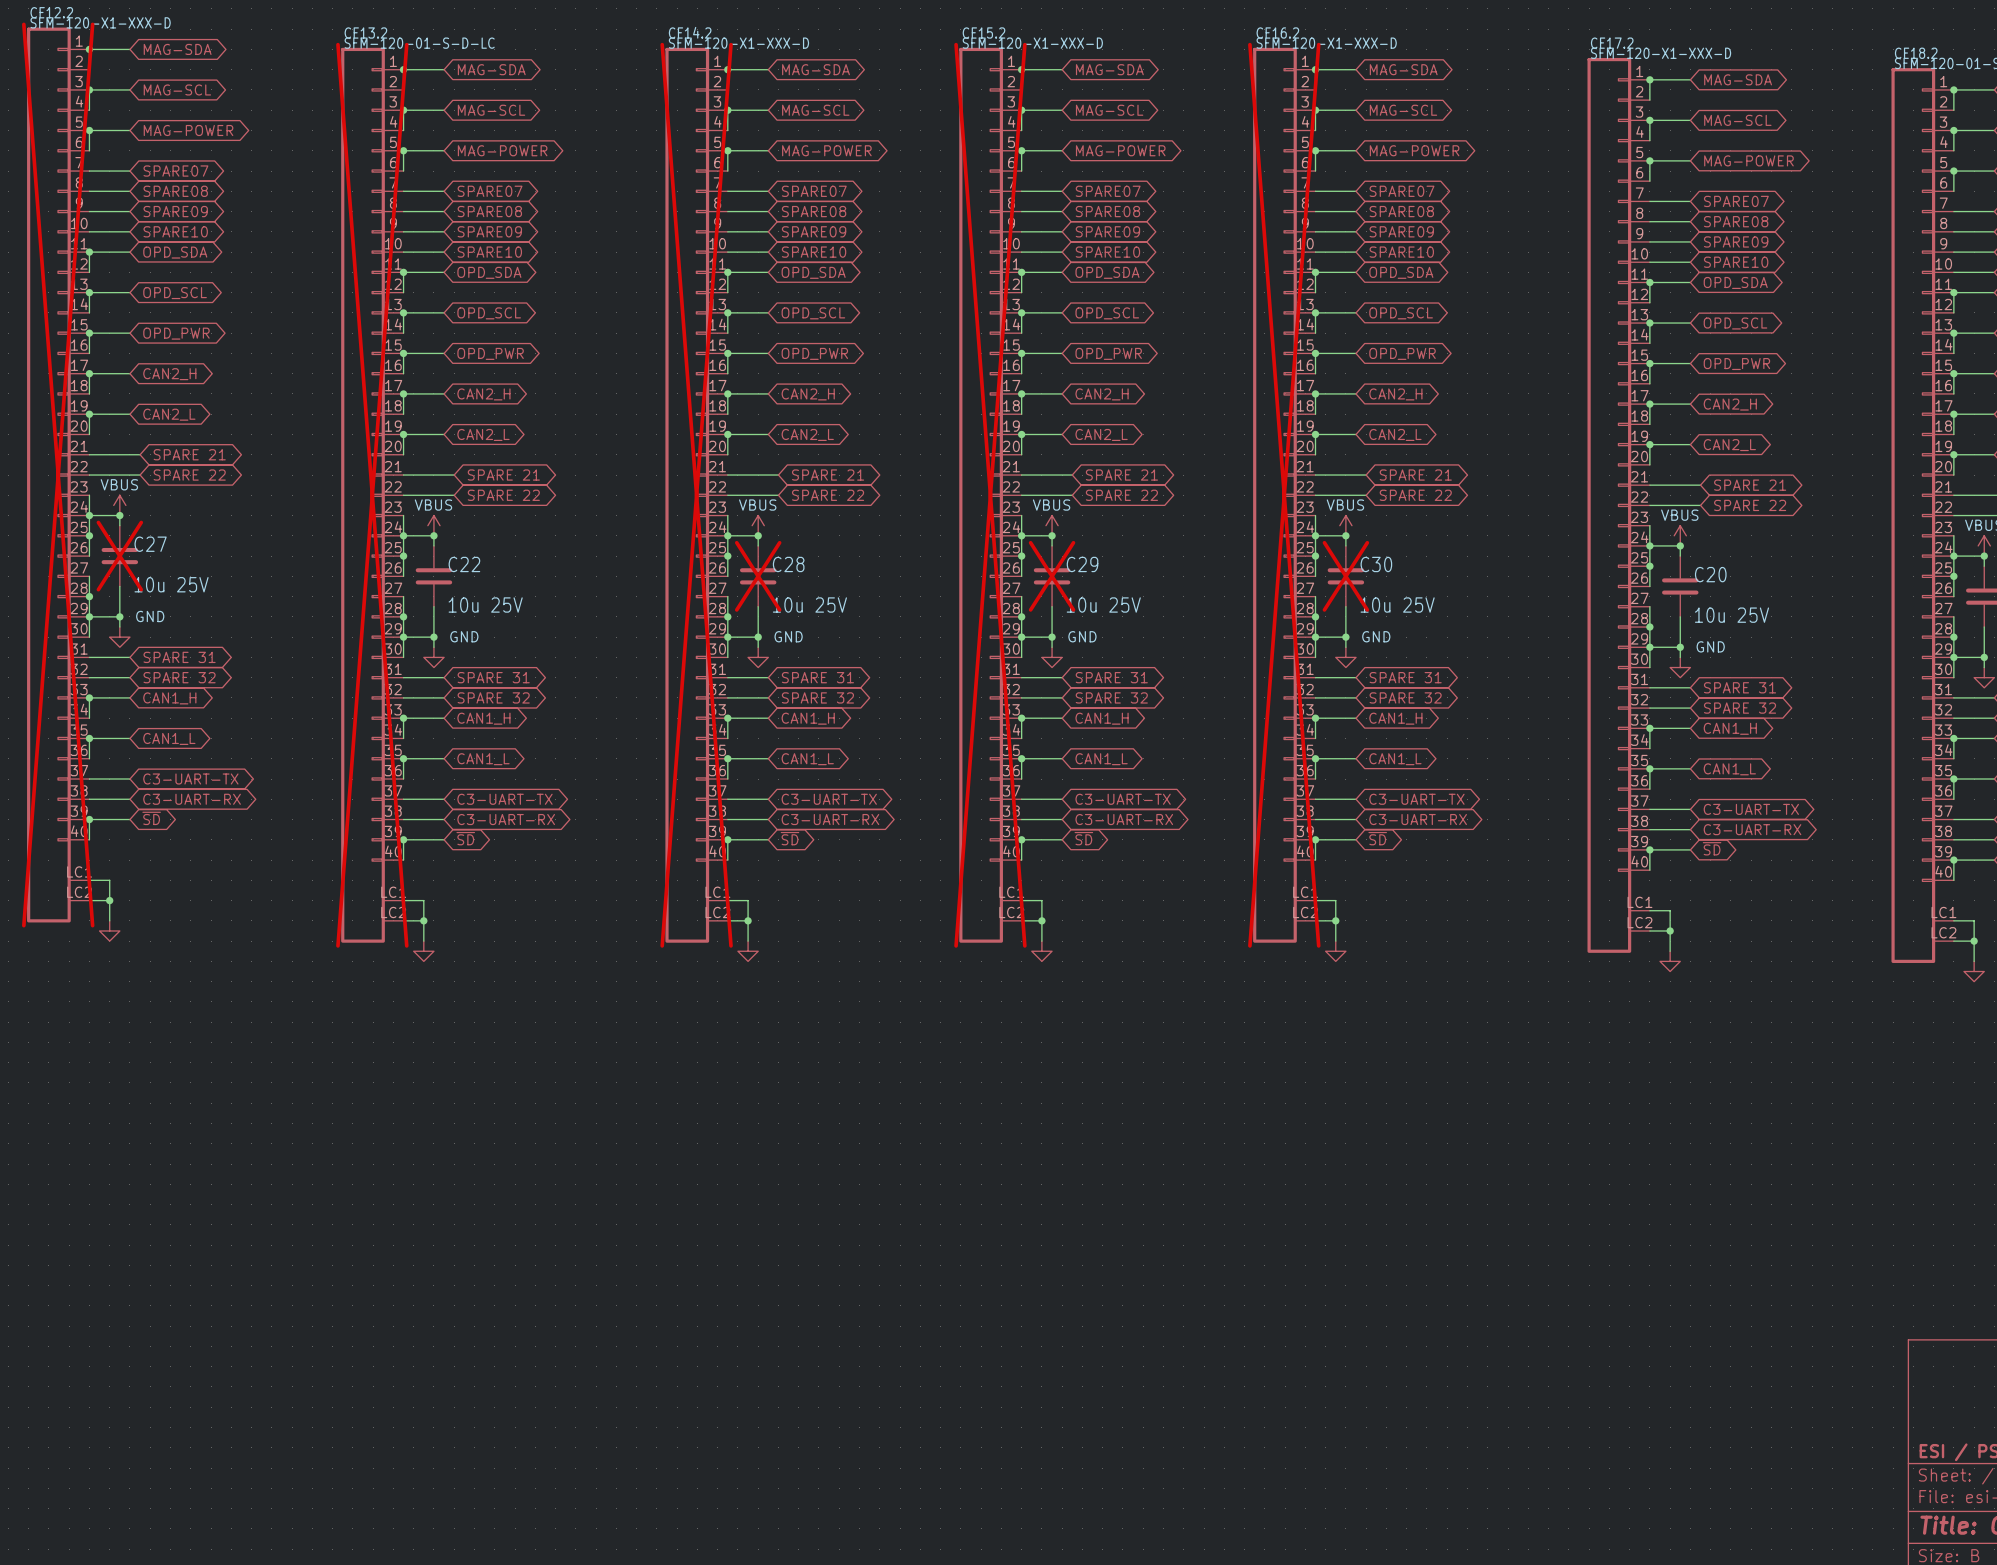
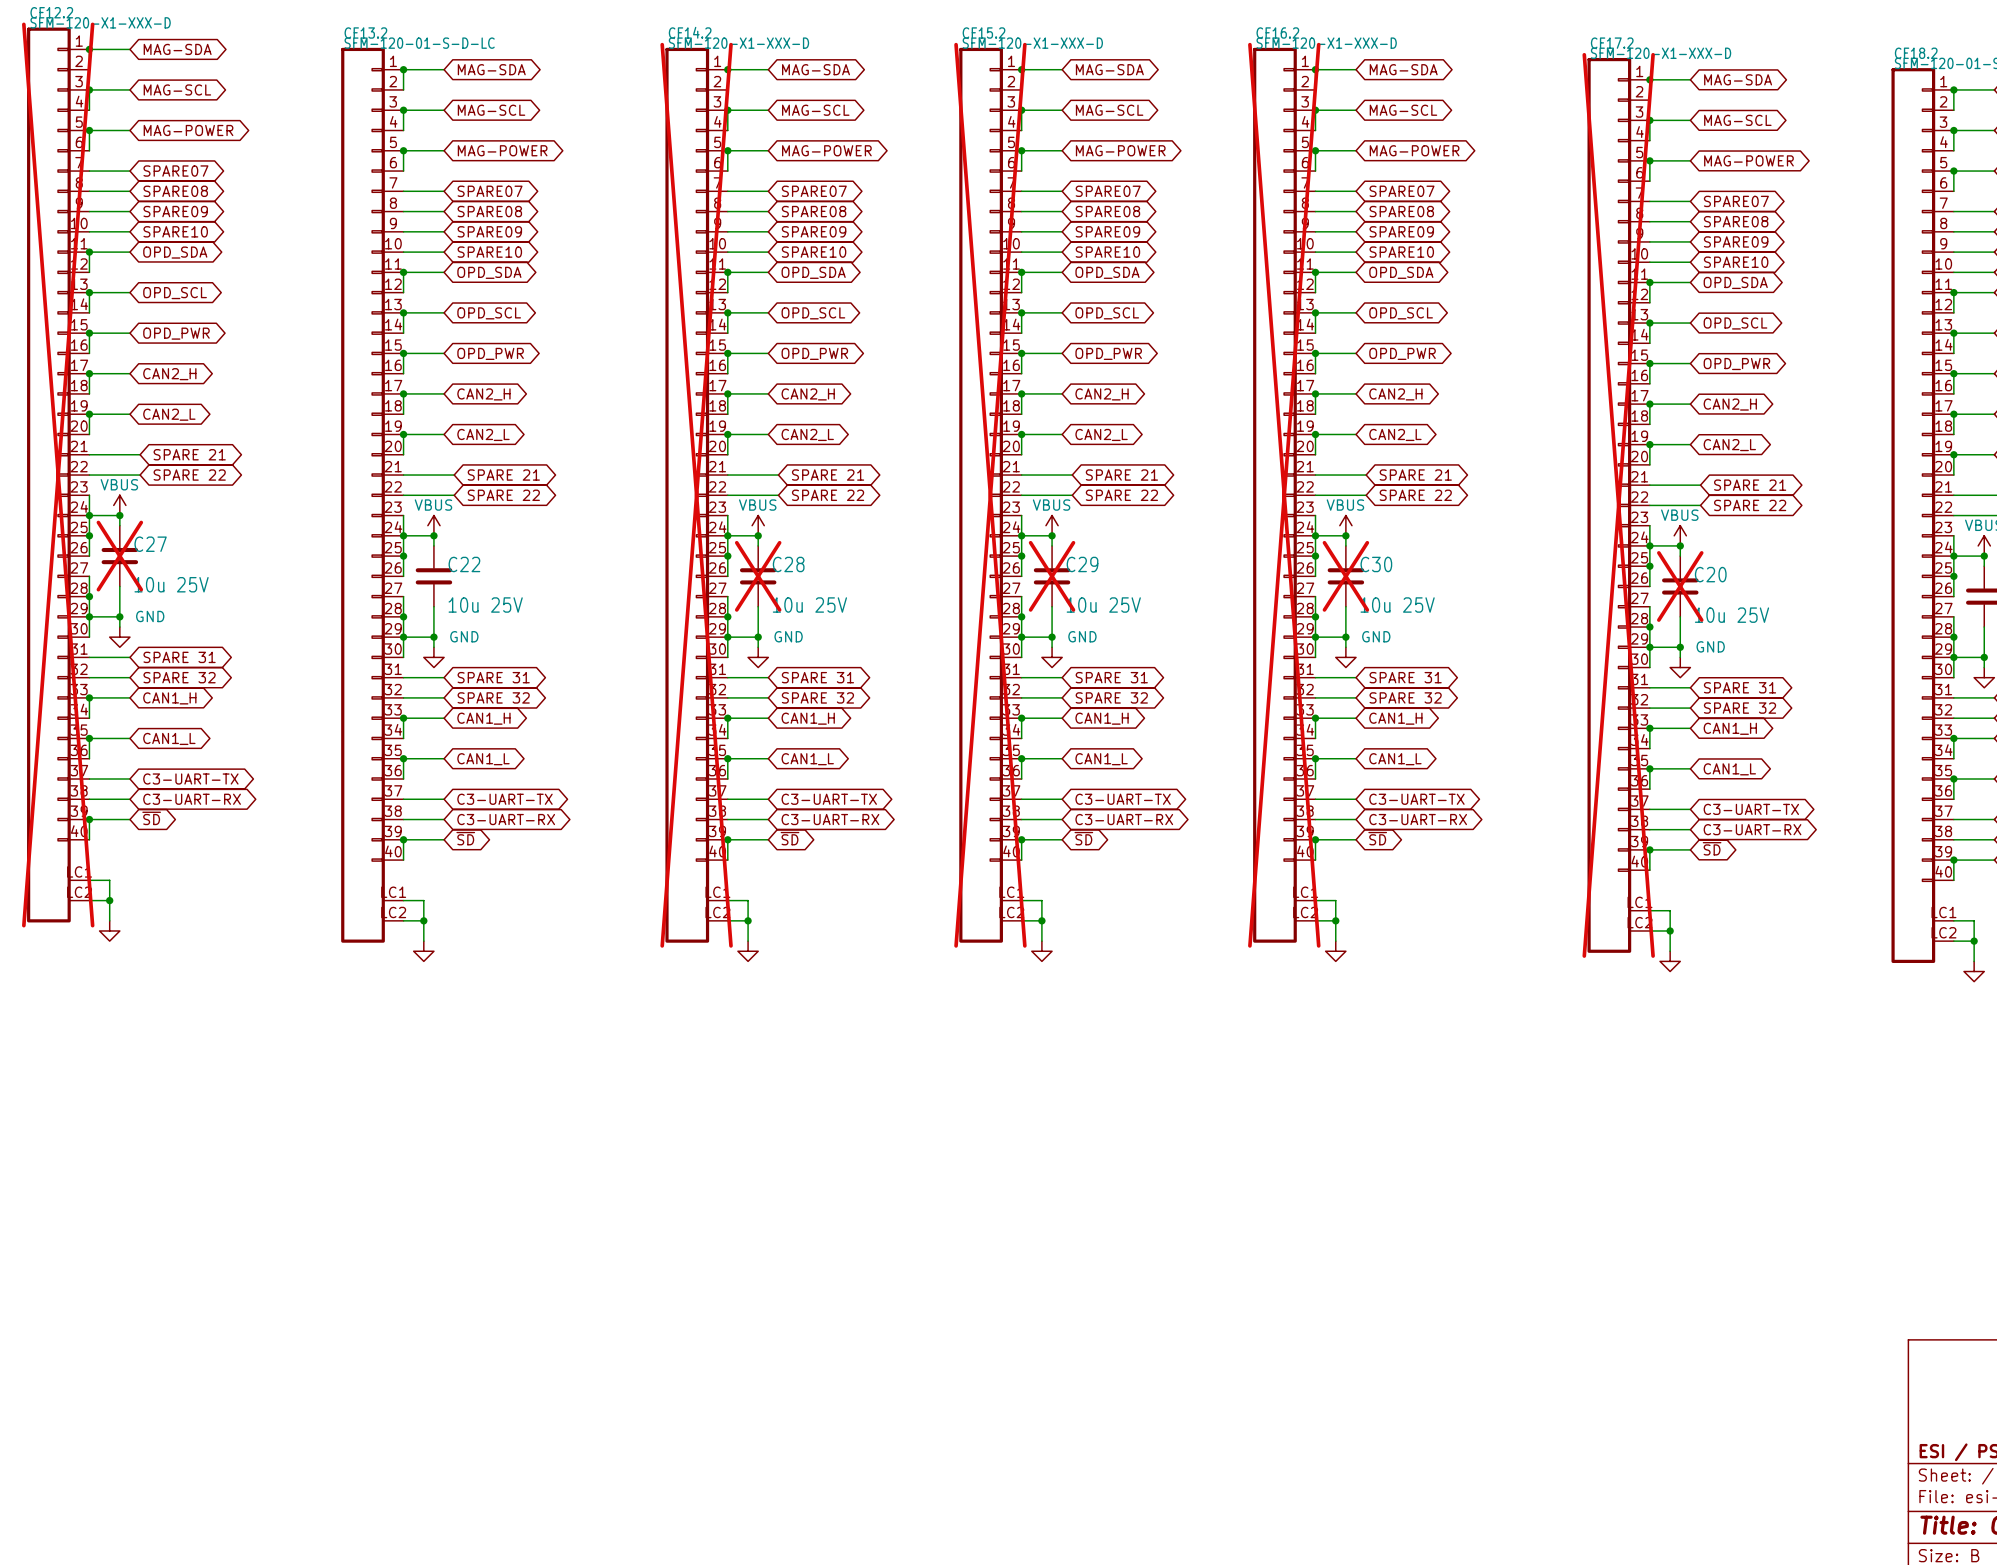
CF13.2 do-not-place cross: (372, 495) -> none
CF17.2 do-not-place cross: none -> (1618, 505)
C20 do-not-place cross: none -> (1680, 586)

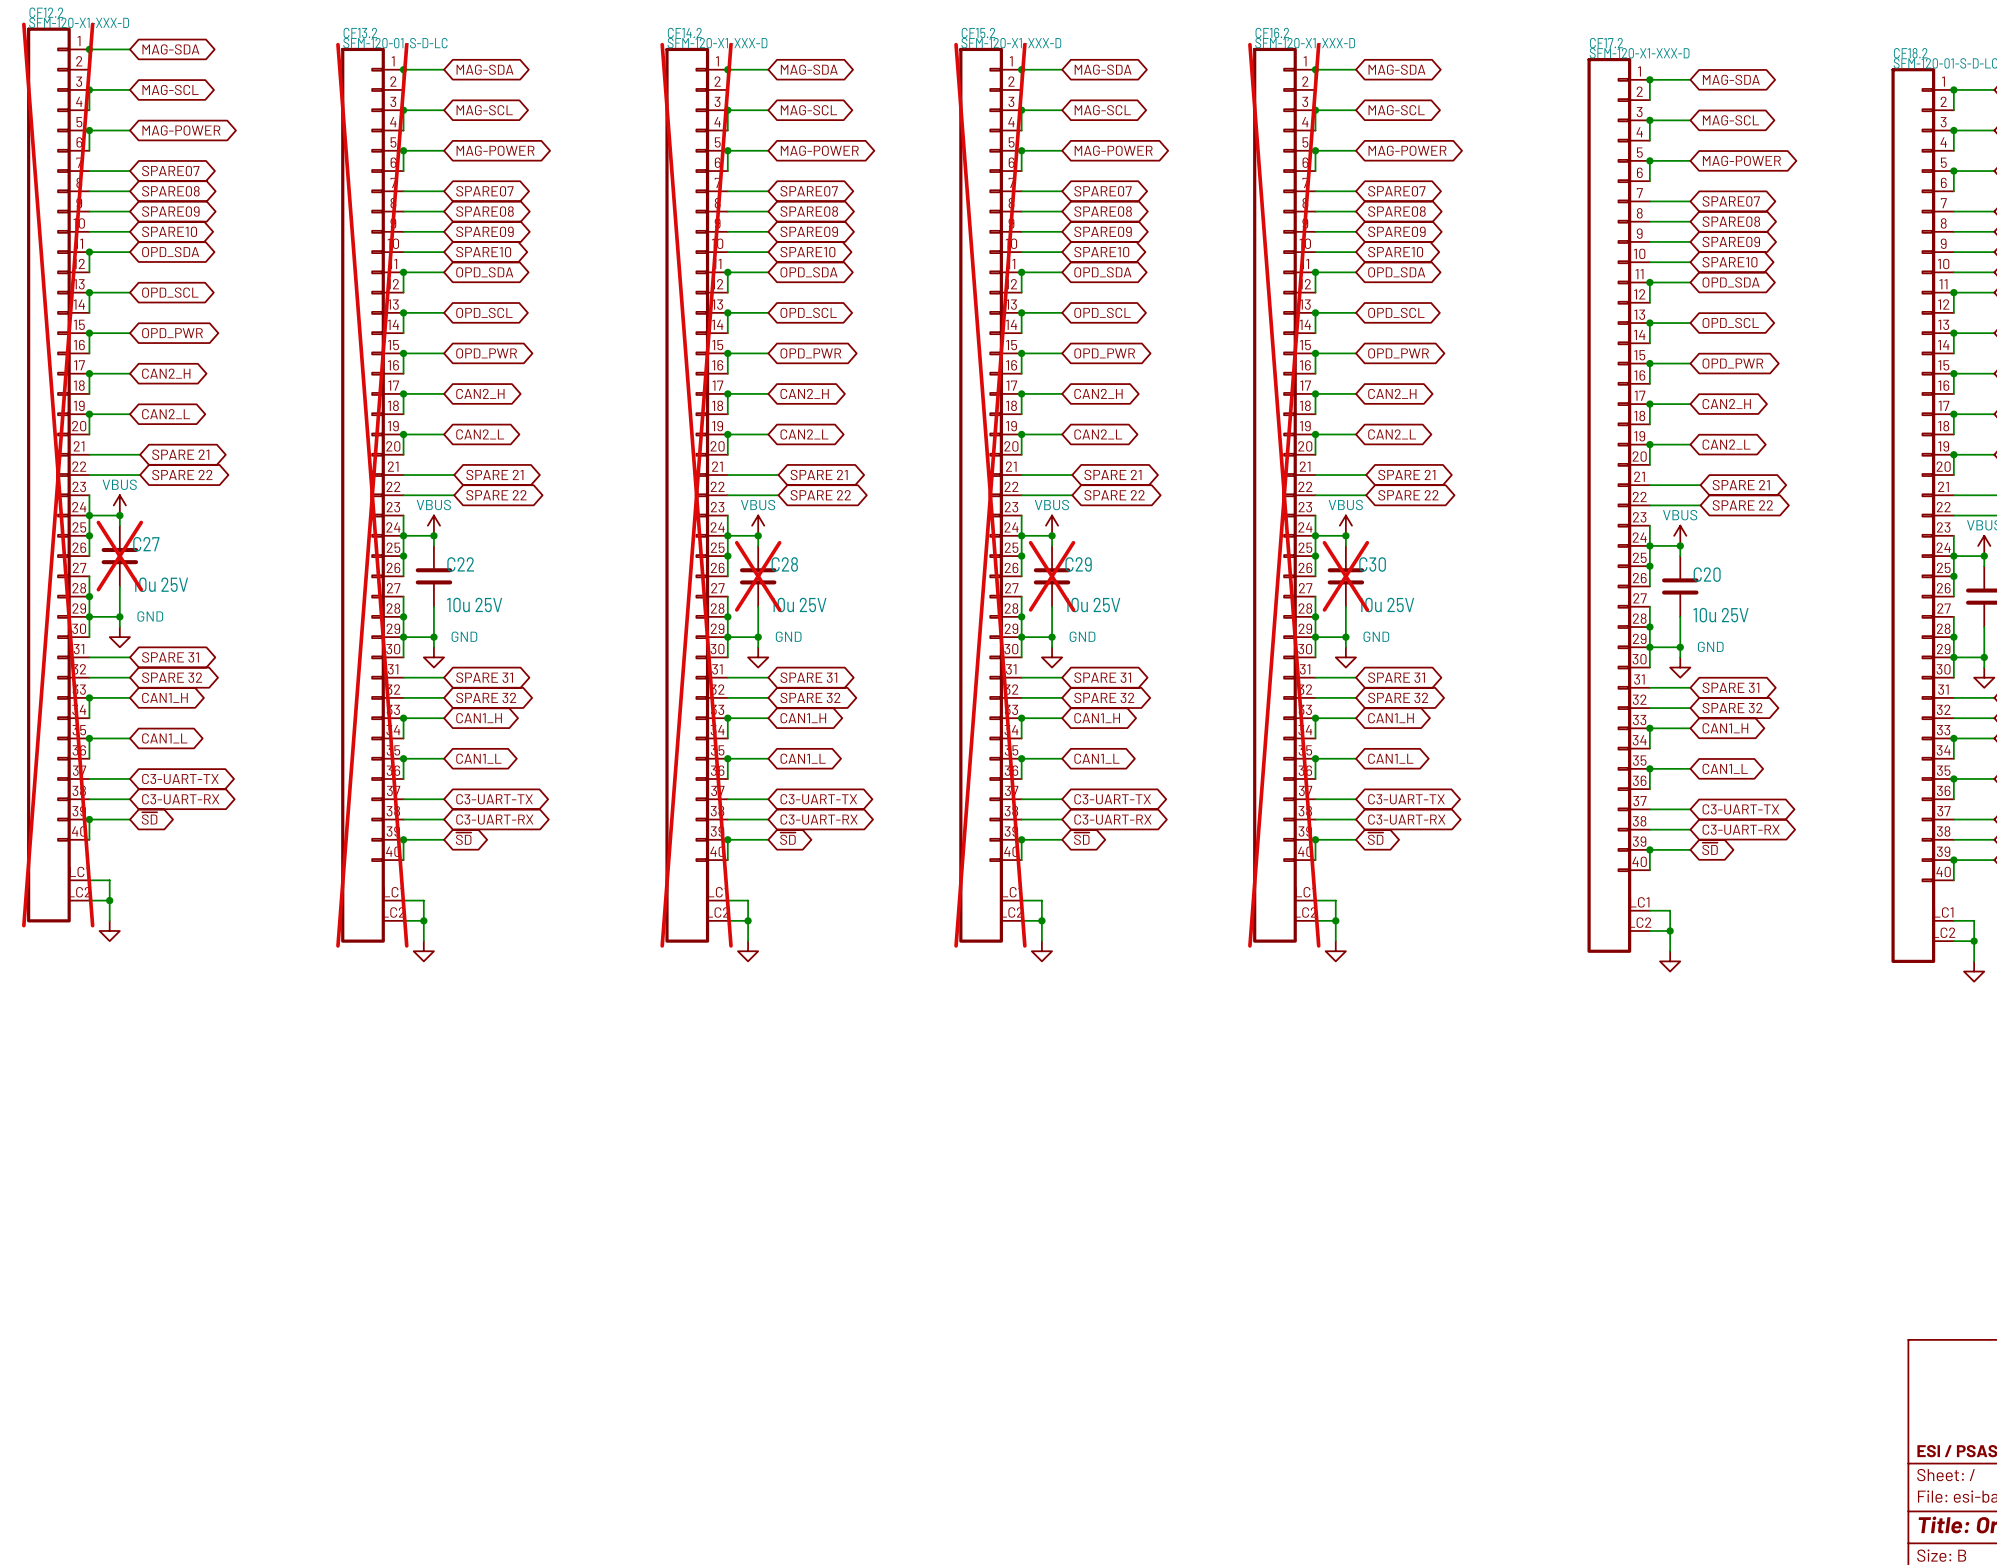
CF13.2 do-not-place cross: none -> (372, 495)
CF17.2 do-not-place cross: (1618, 505) -> none
C20 do-not-place cross: (1680, 586) -> none

